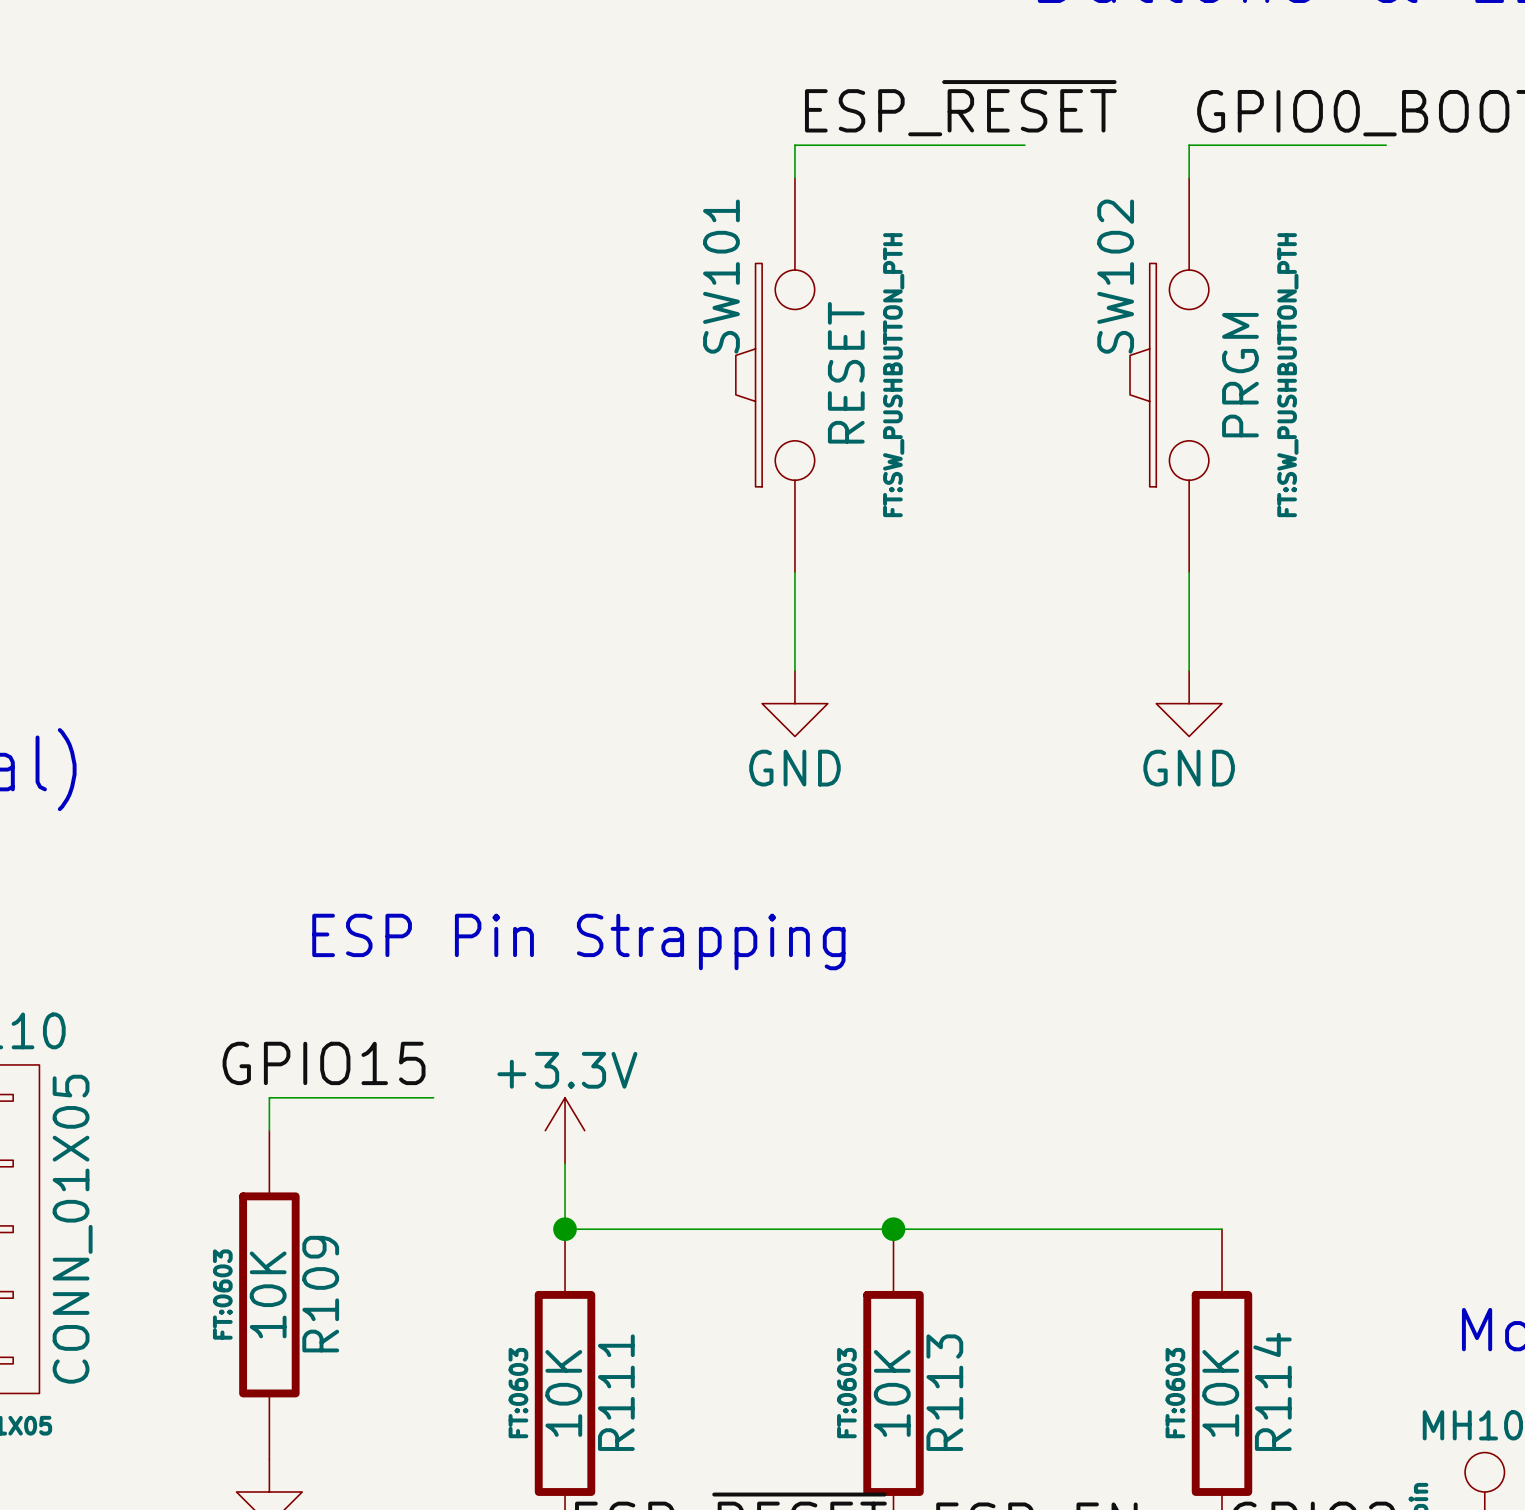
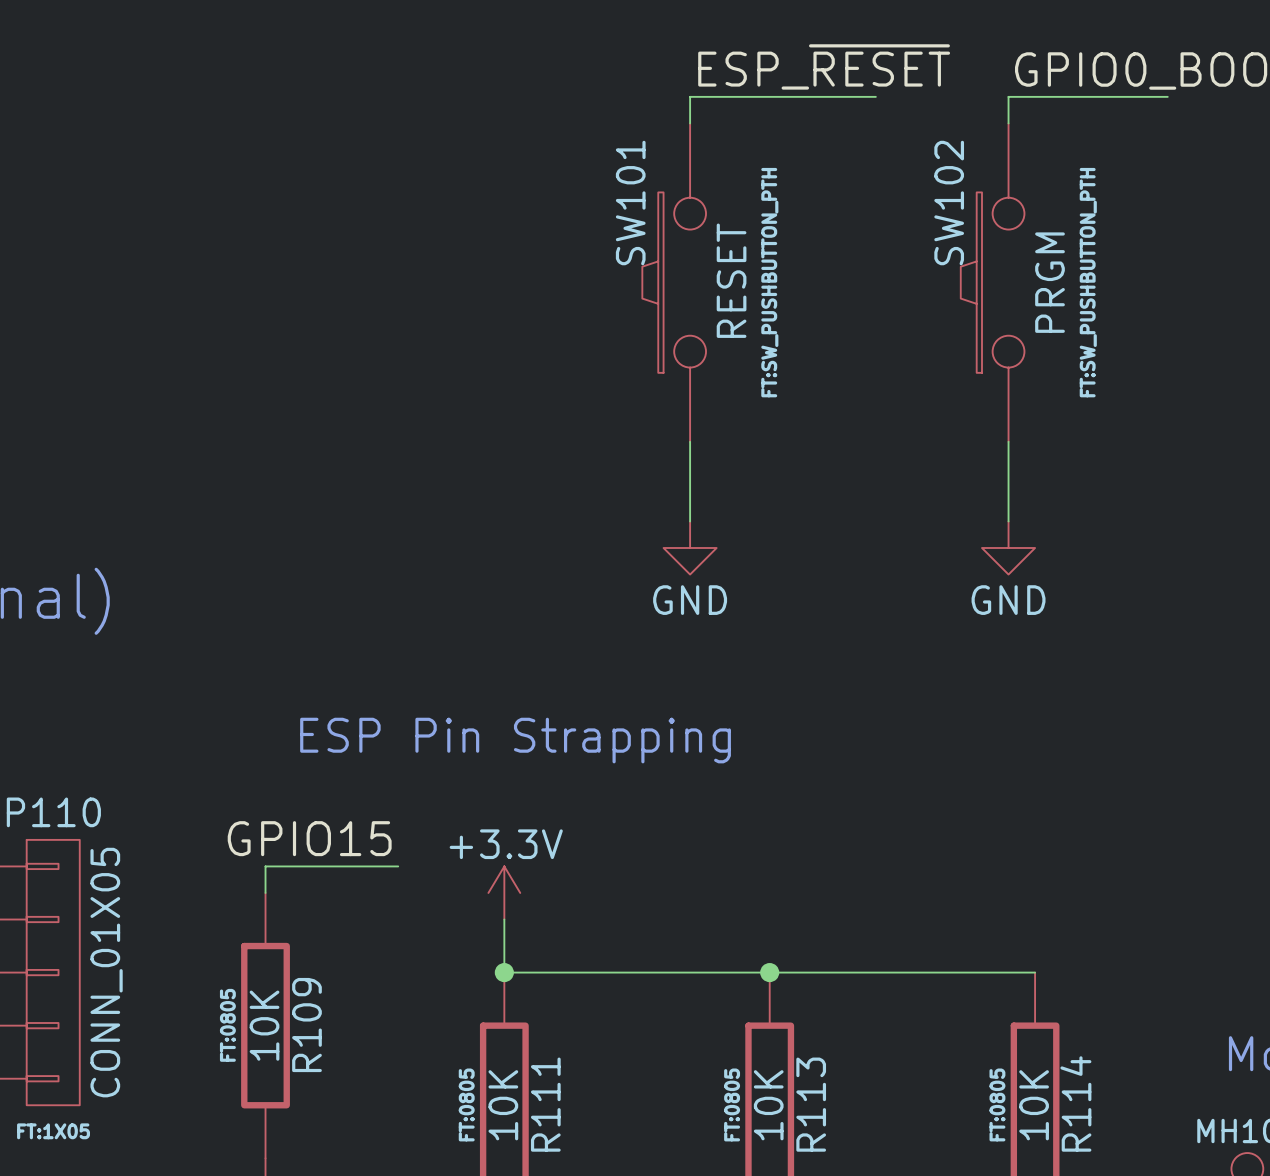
R109 text: FT:0603 (222, 1294) -> FT:0805 (227, 1025)
R111 text: FT:0603 (518, 1393) -> FT:0805 (466, 1104)
R113 text: FT:0603 (846, 1393) -> FT:0805 (732, 1104)
R114 text: FT:0603 (1175, 1393) -> FT:0805 (997, 1104)

